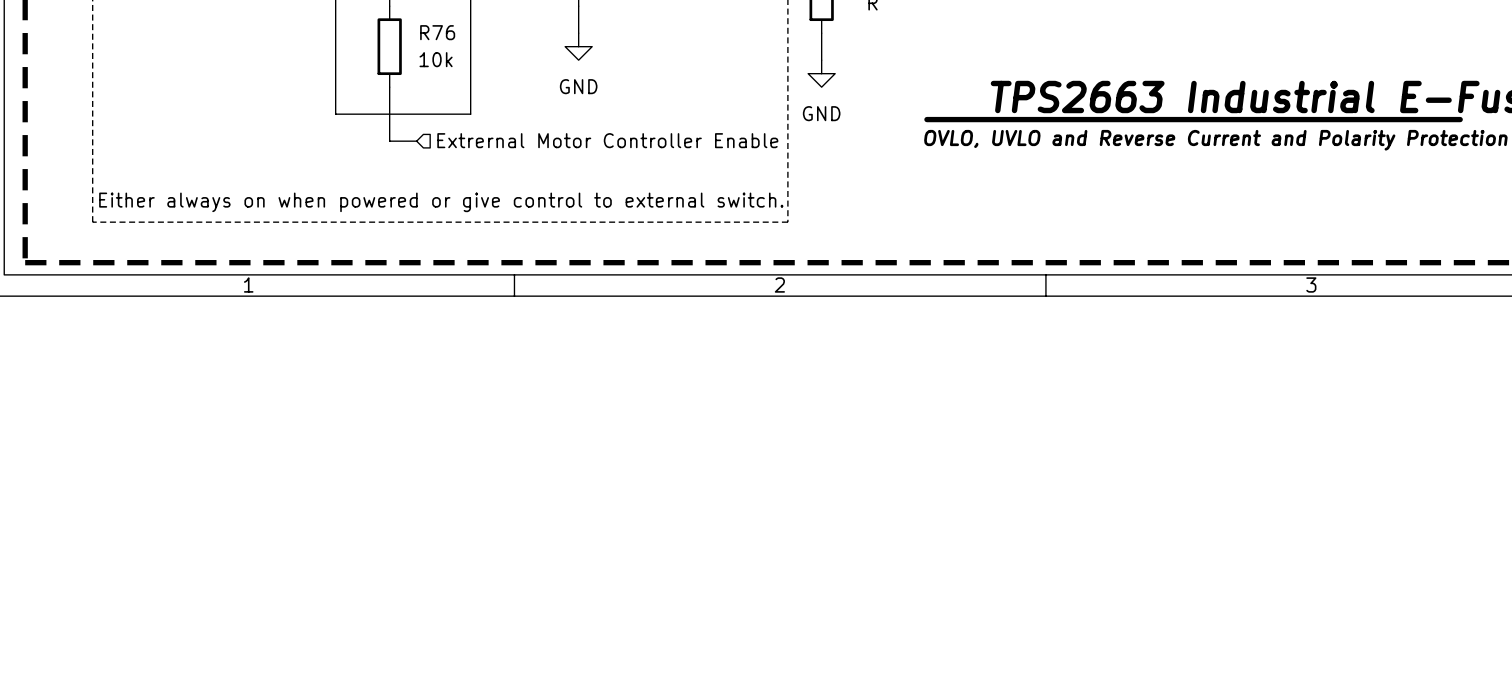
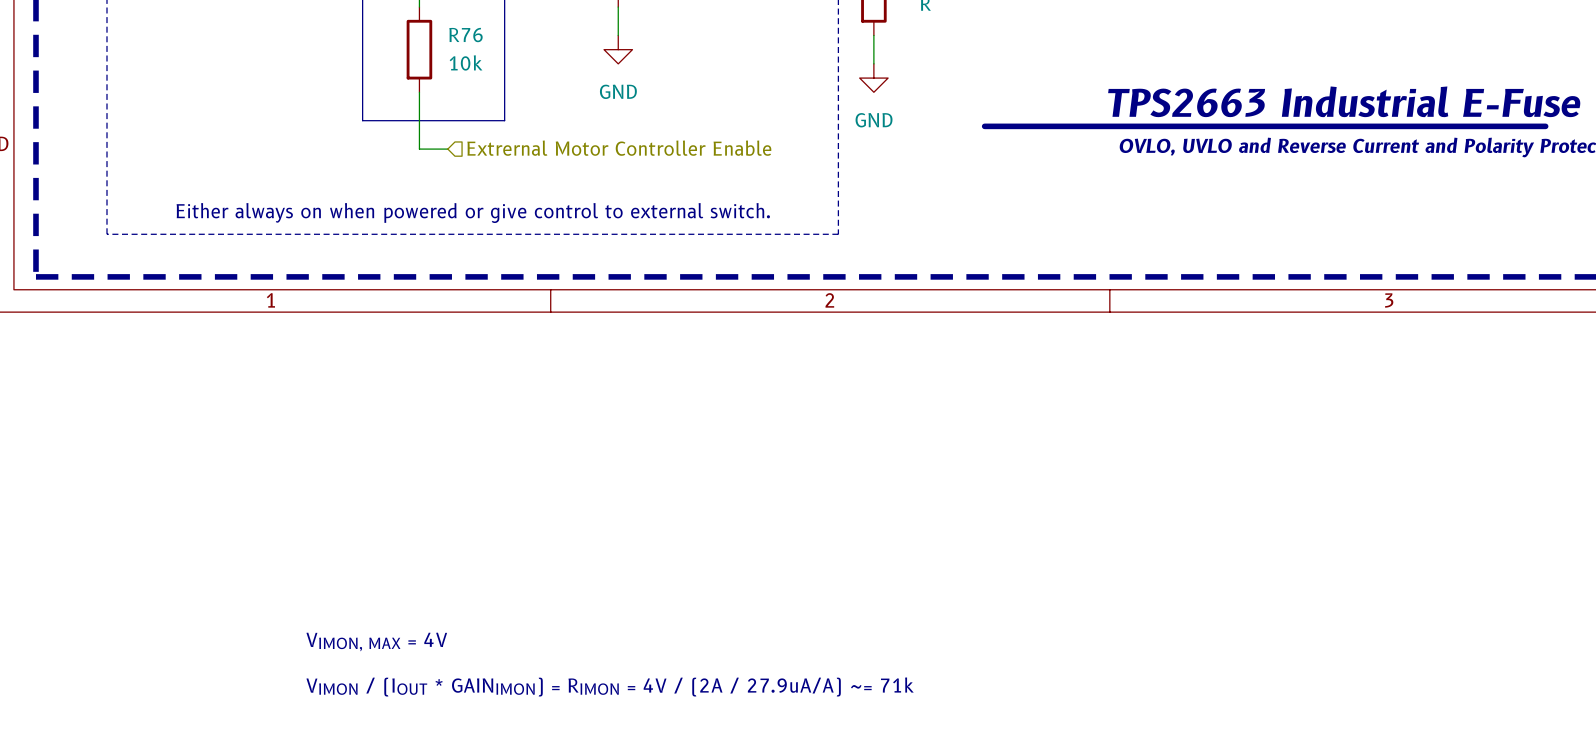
text: none -> VIMON, MAX = 4V (376, 641)
text: none -> VIMON / (IOUT * GAINIMON) = RIMON = 4V / (2A / 27.9uA/A) ~= 71k (610, 686)

